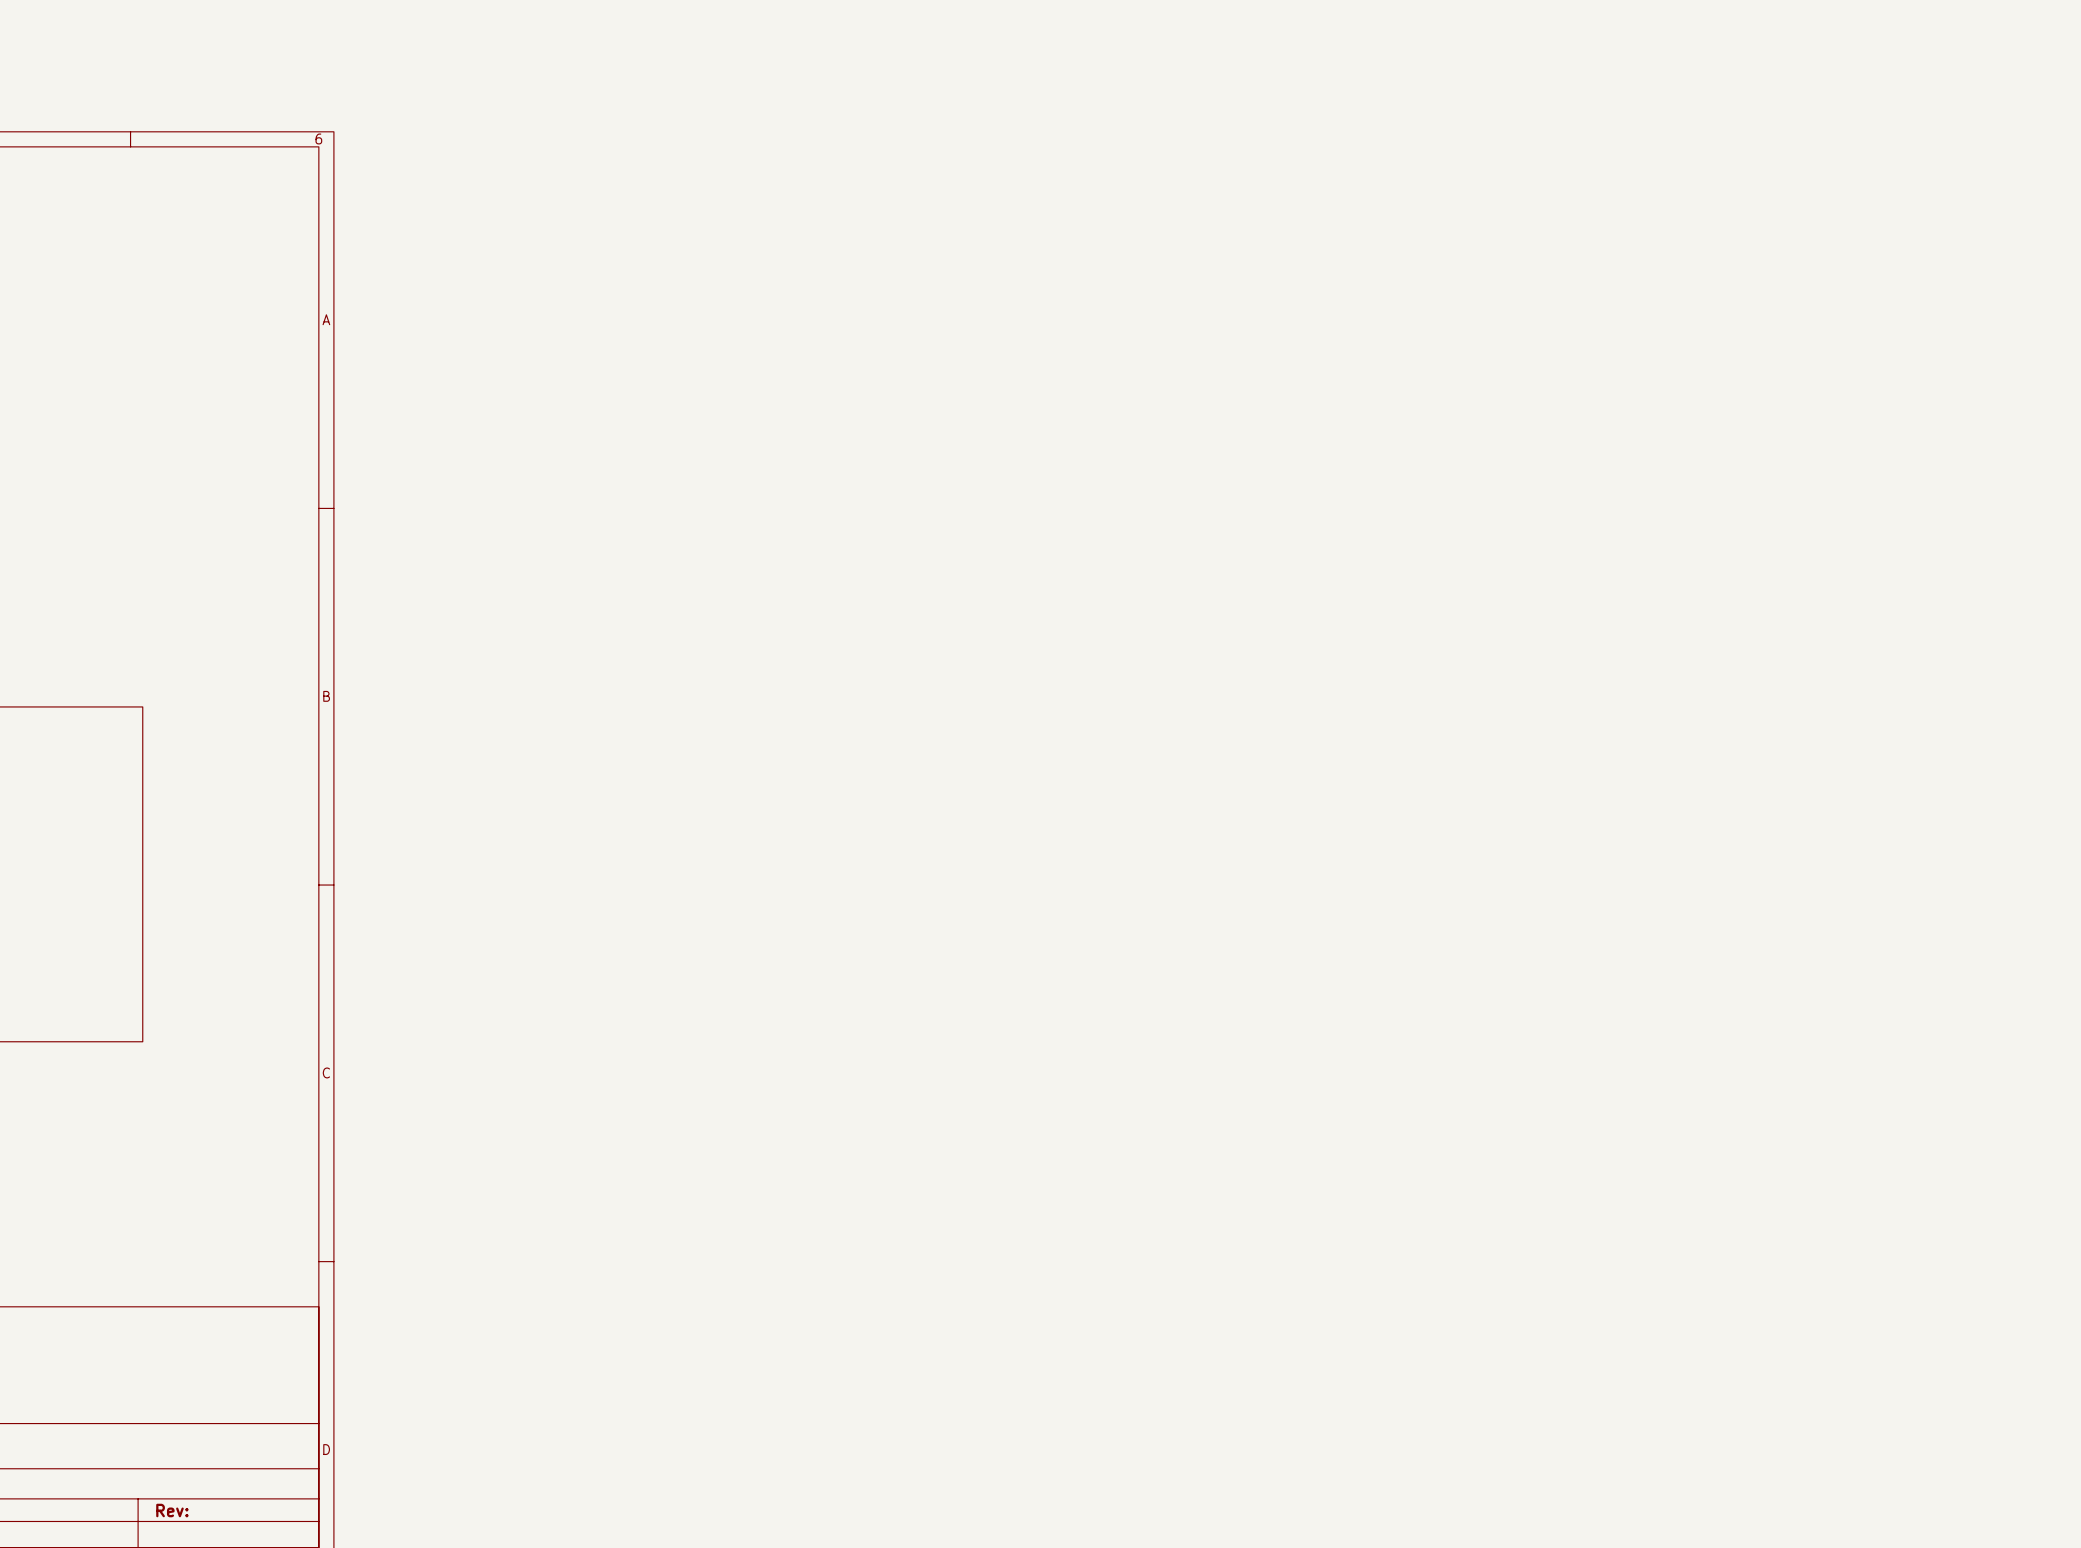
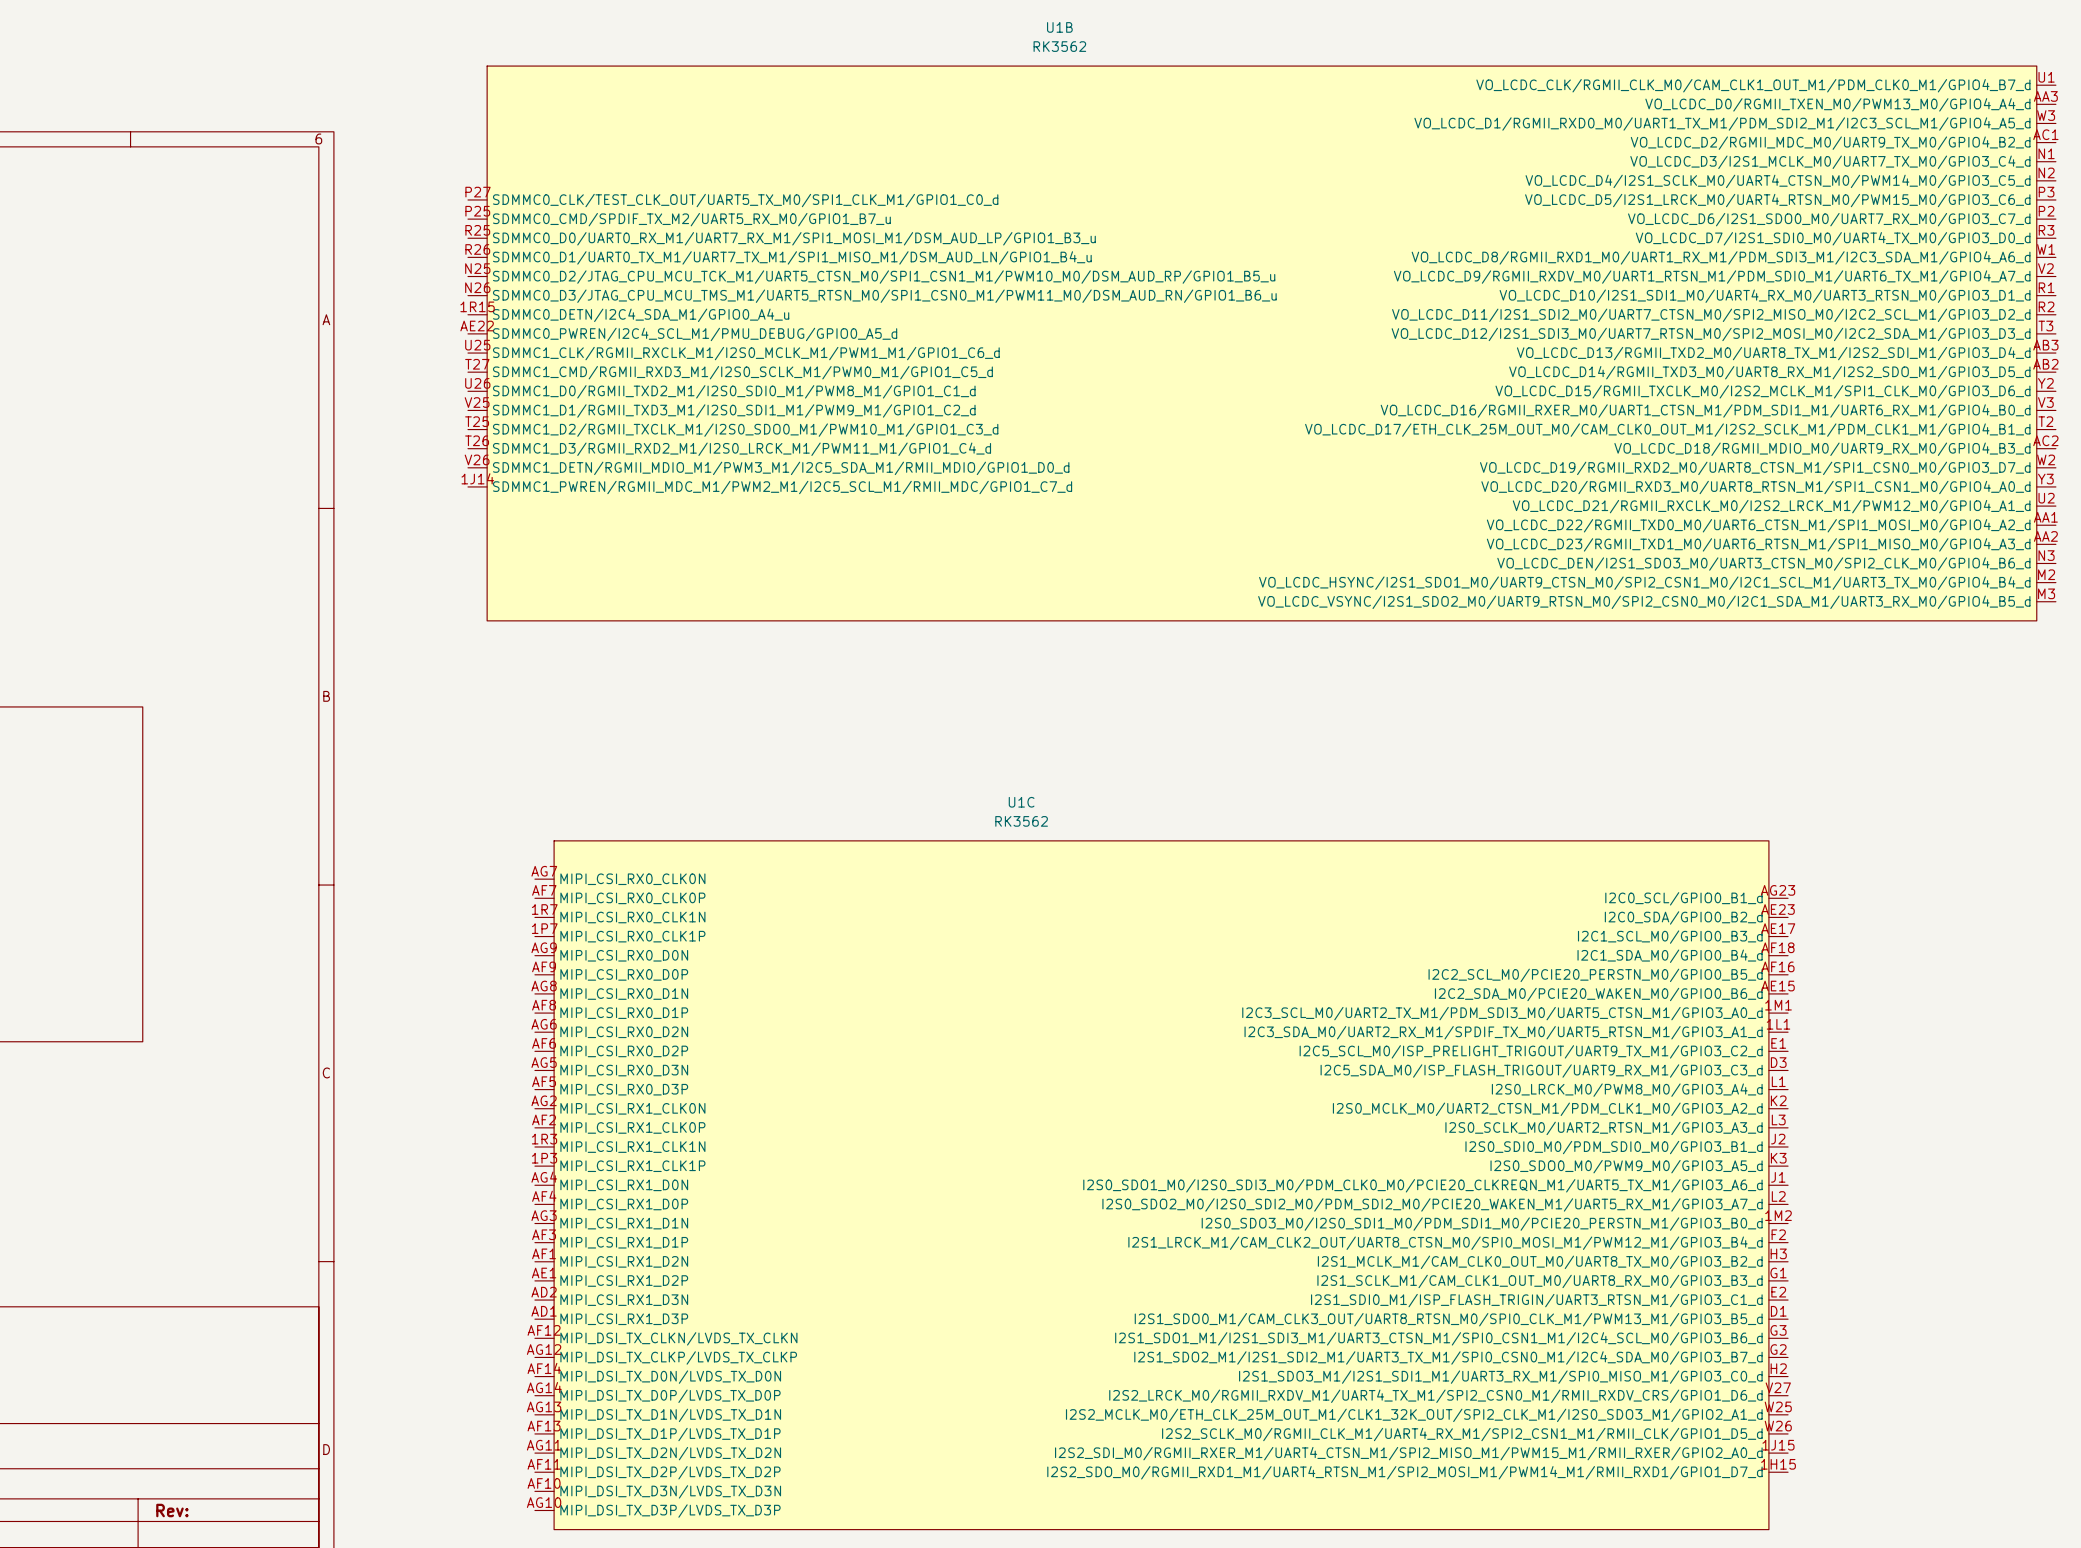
U1B: none -> RK3562 (1261, 343)
U1C: none -> RK3562 (1161, 1185)

